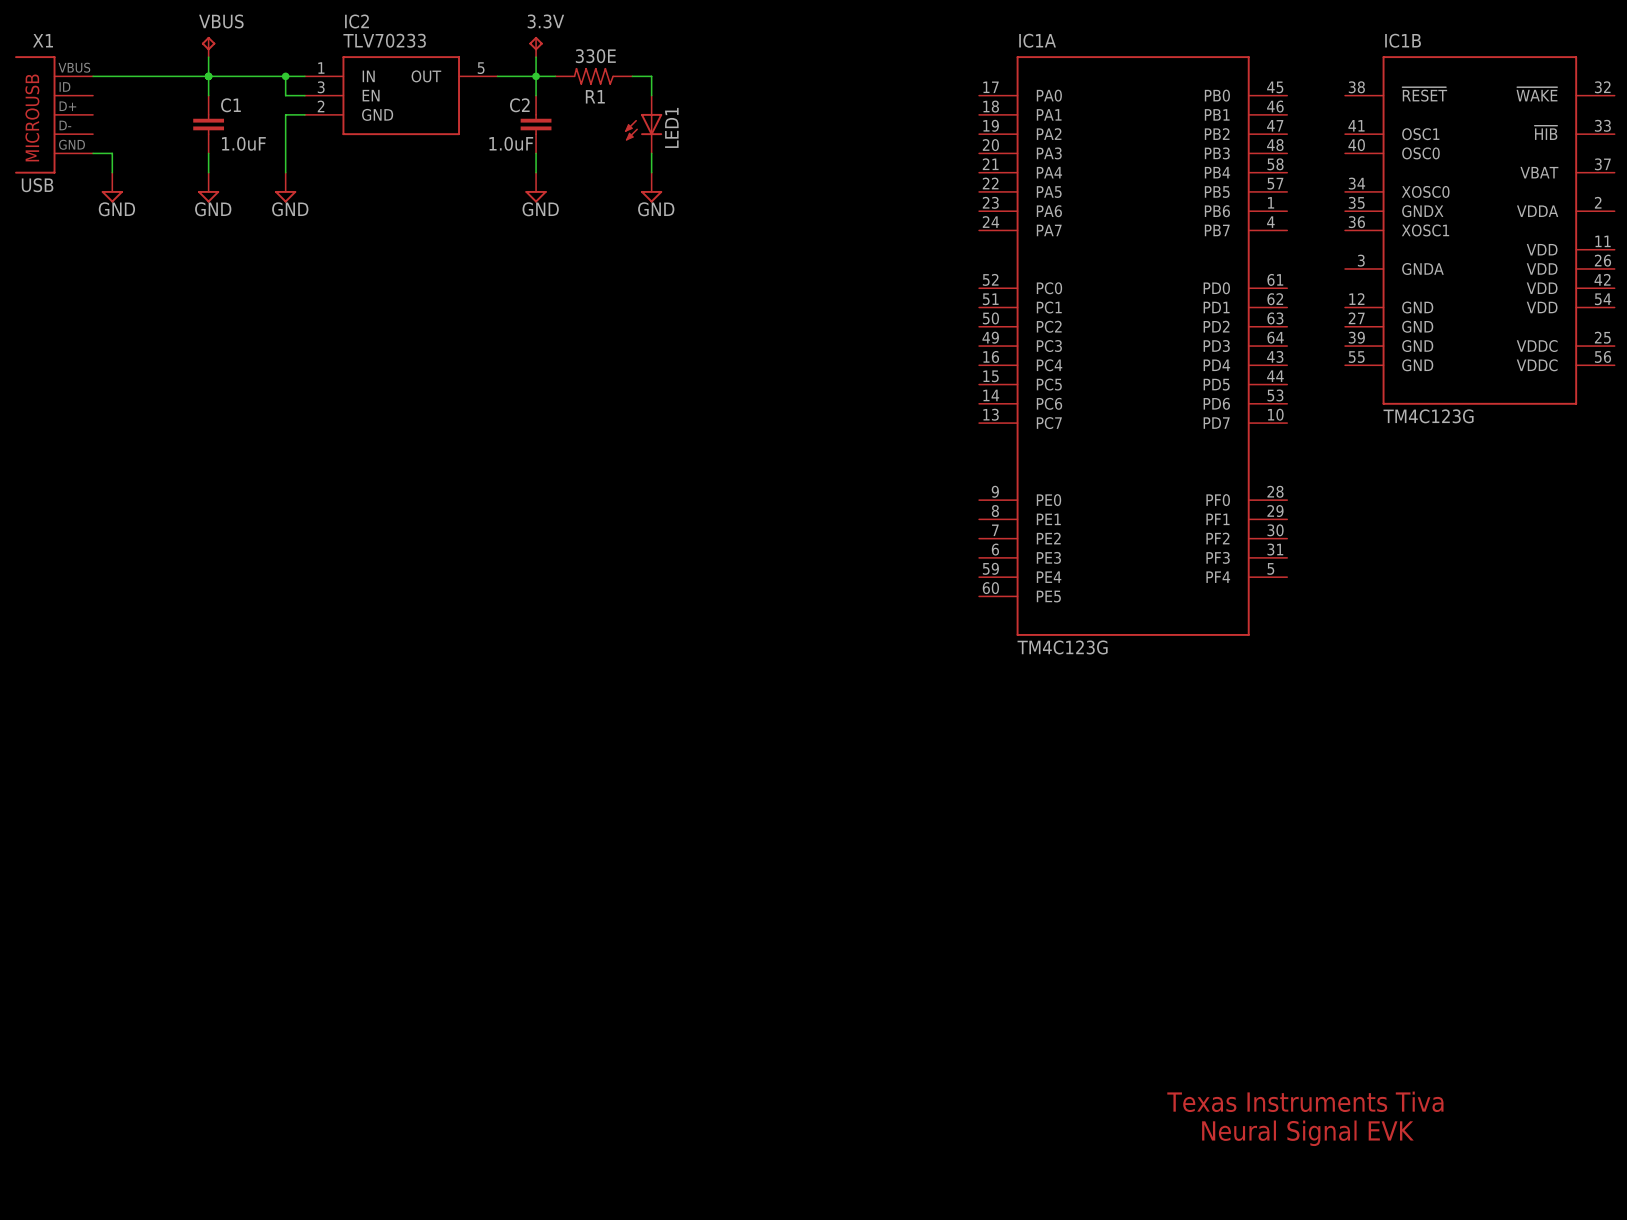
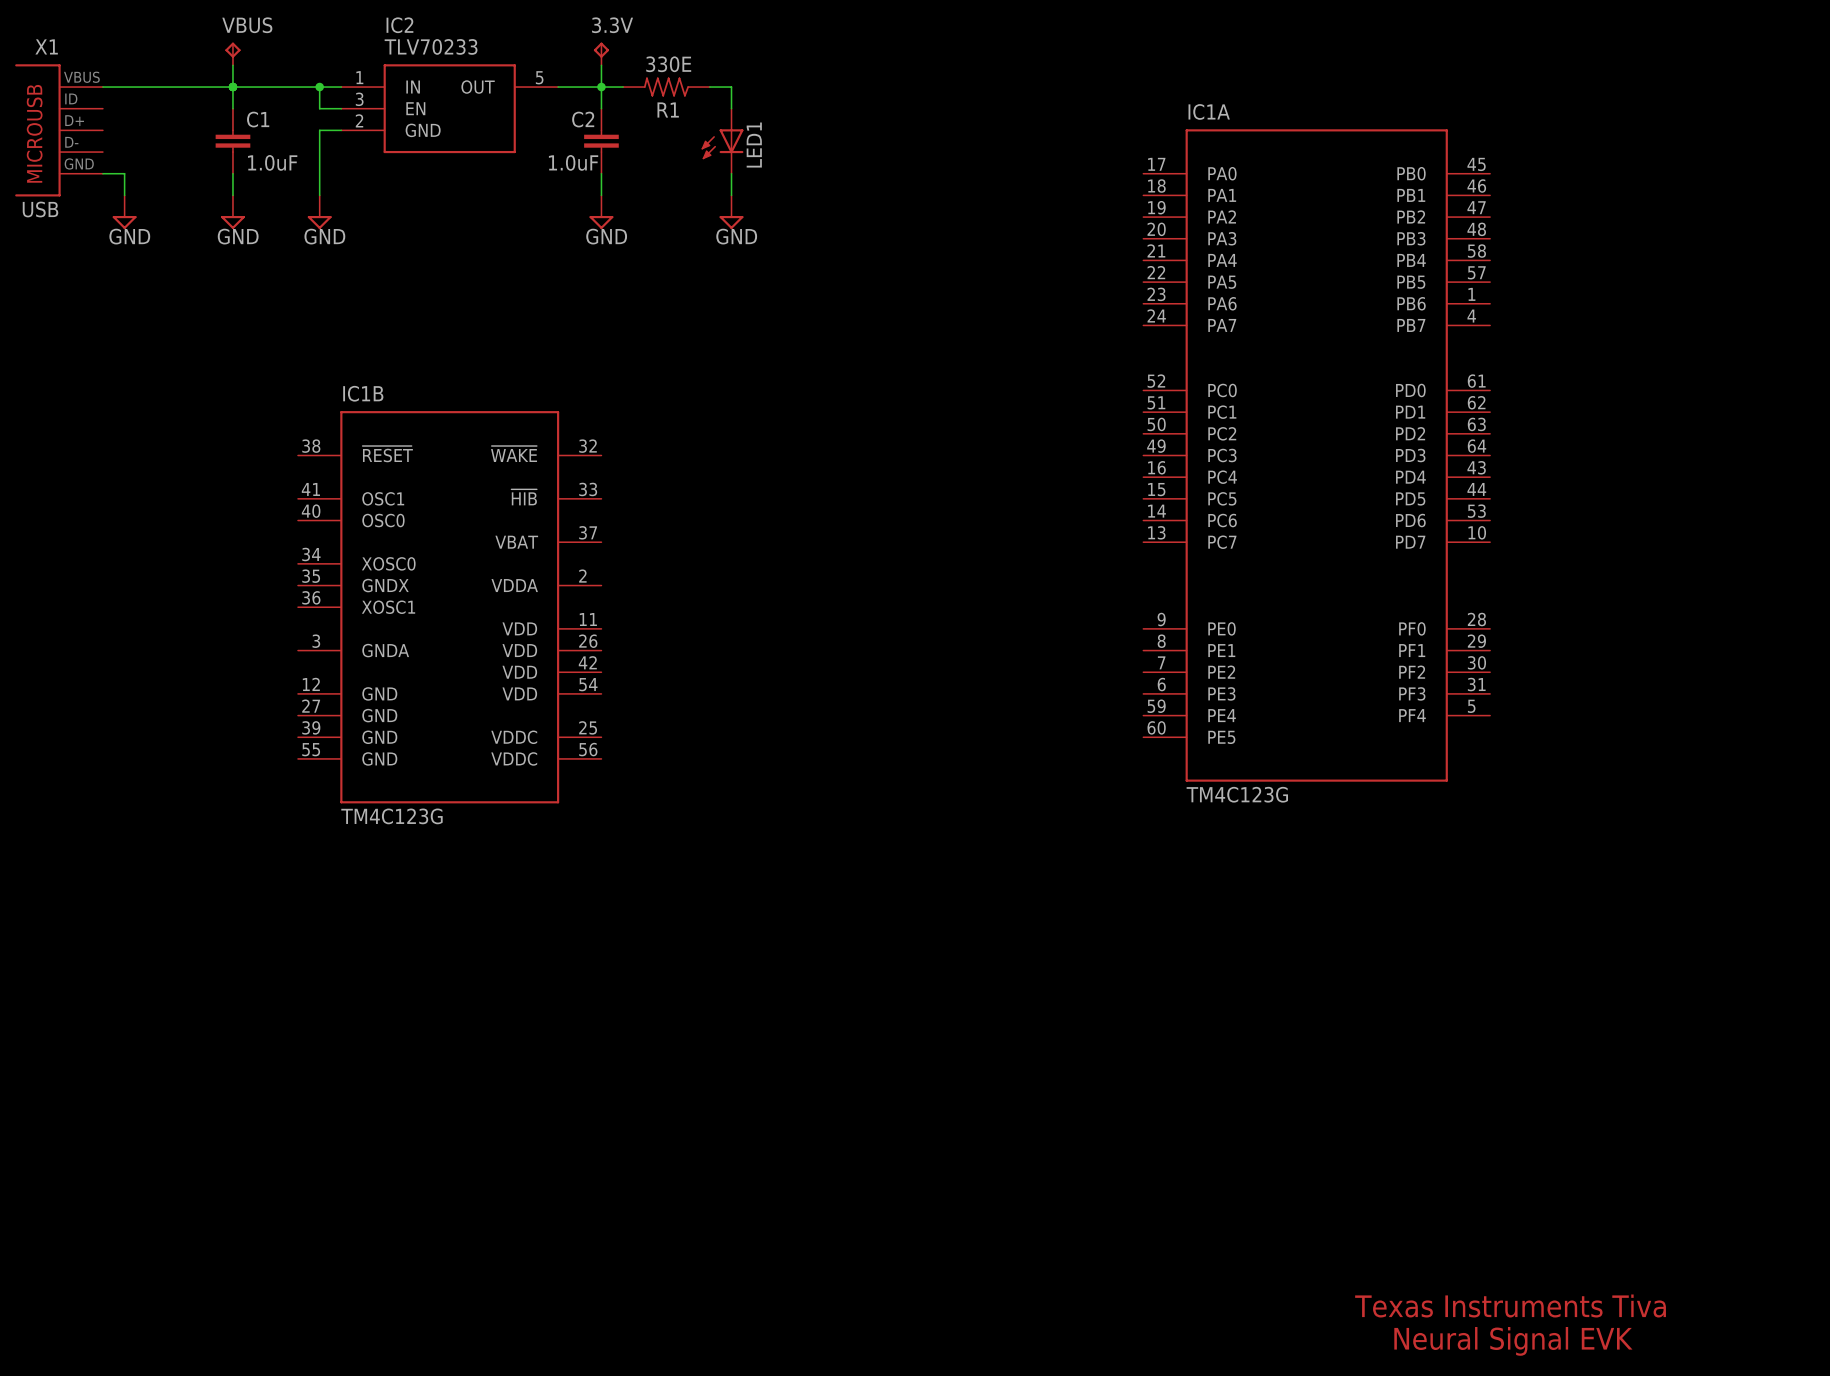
IC1B position: (1479, 230) -> (449, 607)
IC1A position: (1133, 346) -> (1316, 455)
text position: Texas Instruments Tiva (1305, 1101) -> Texas Instruments Tiva (1510, 1305)
text position: Neural Signal EVK (1307, 1133) -> Neural Signal EVK (1513, 1341)

